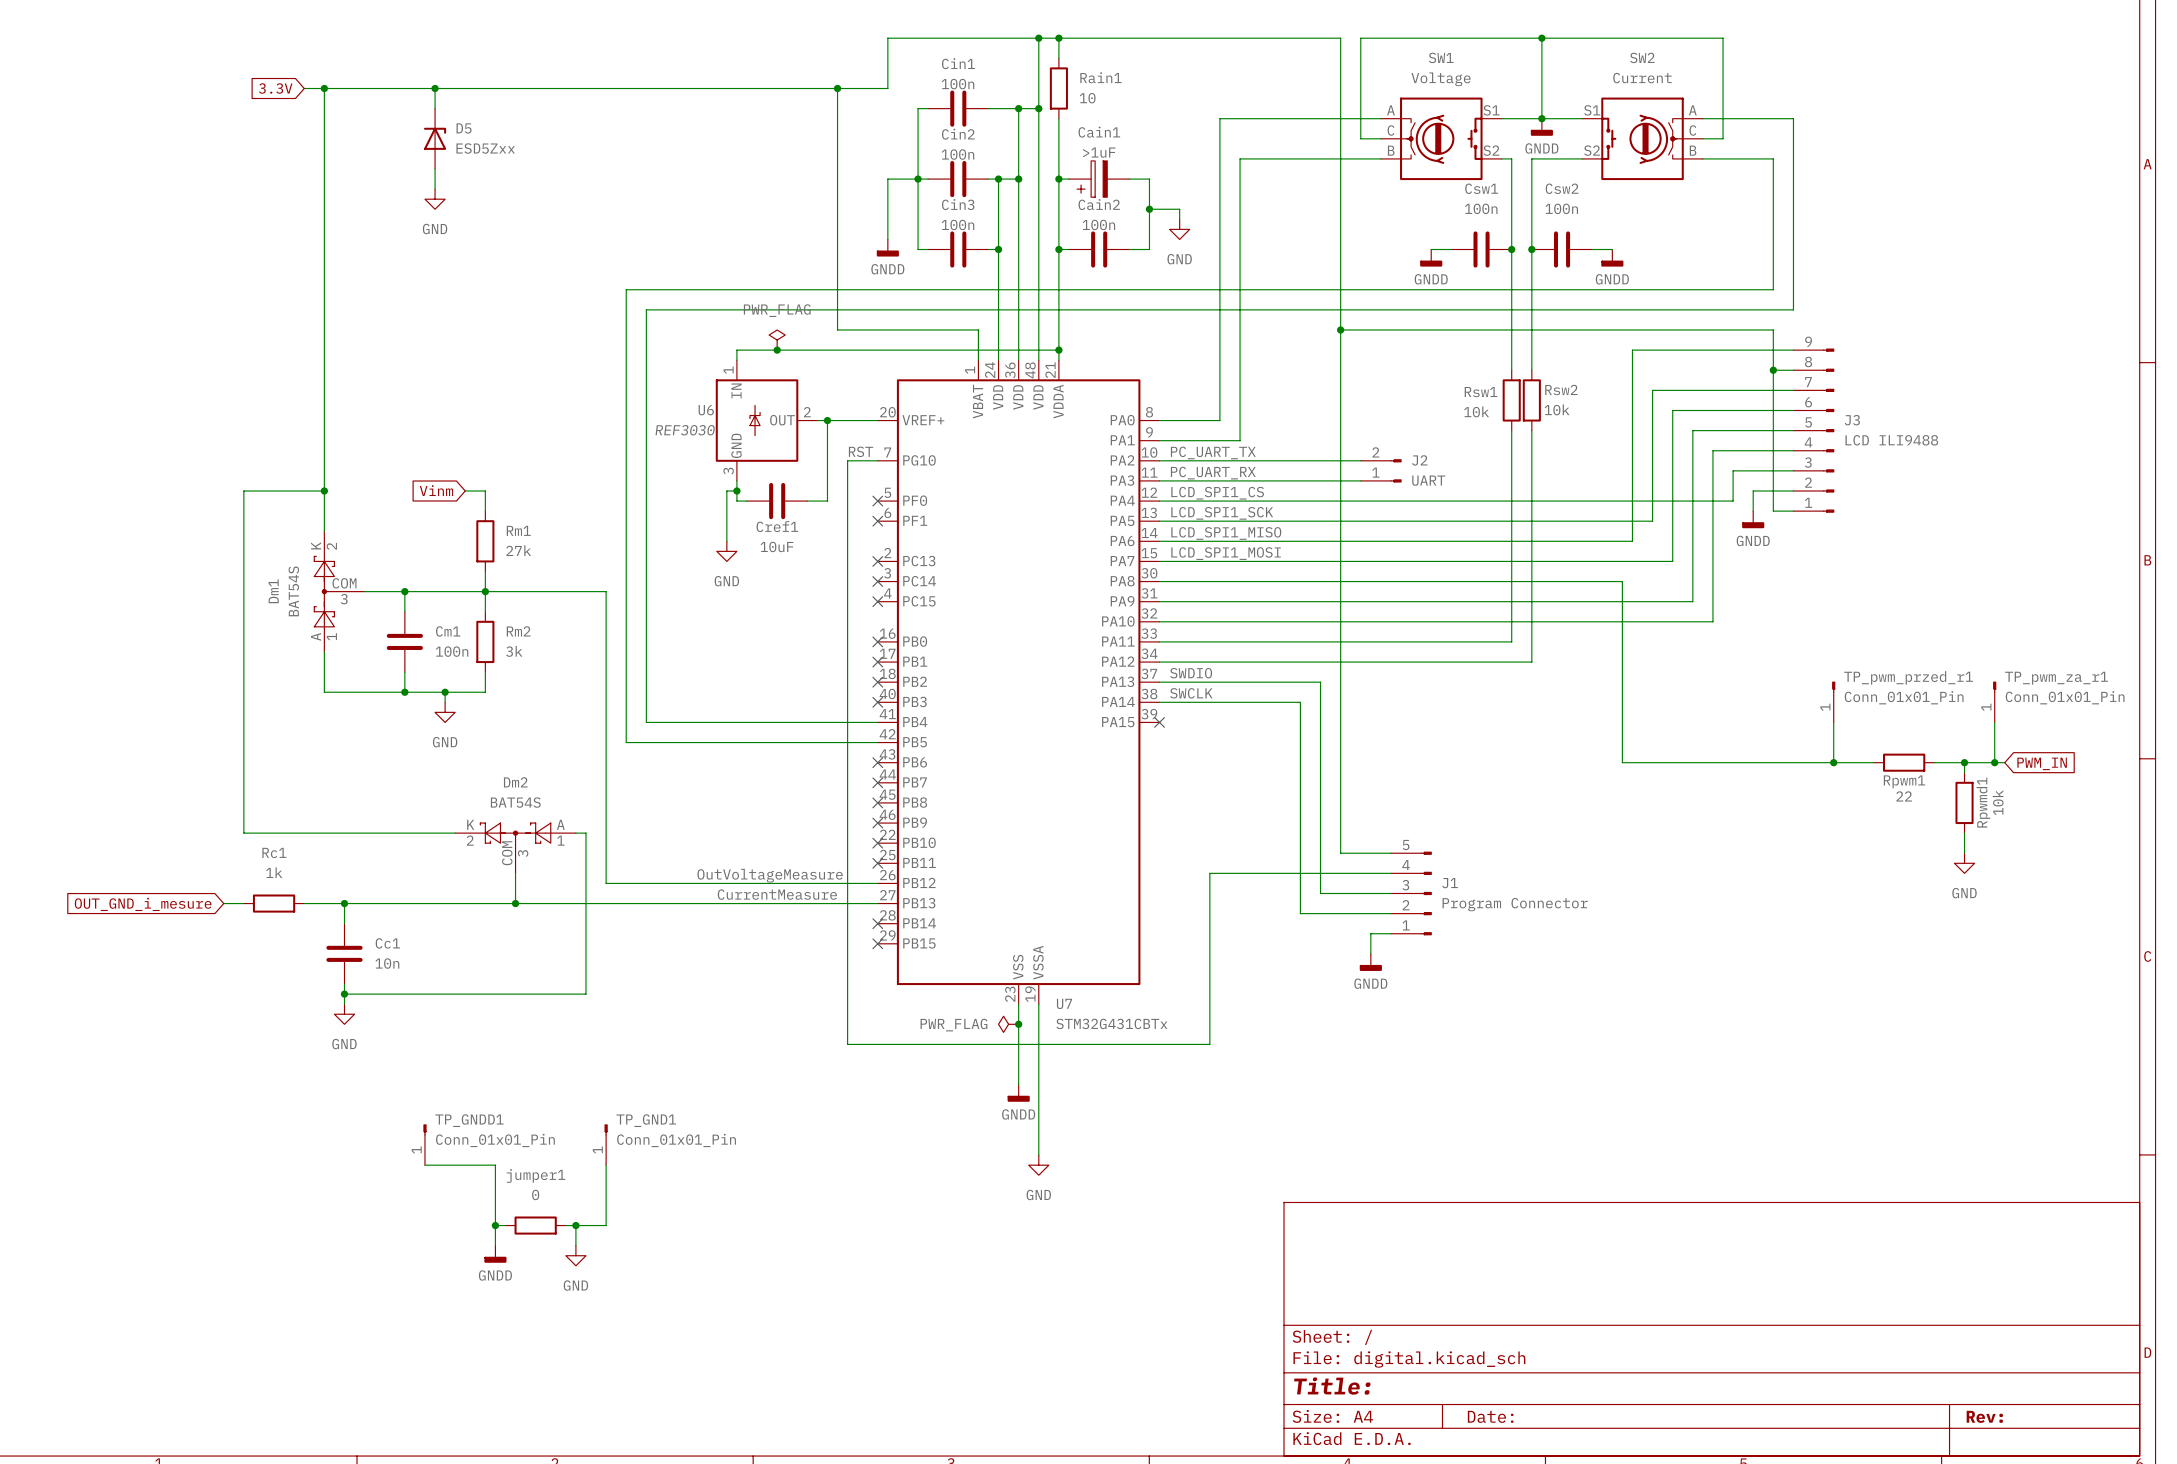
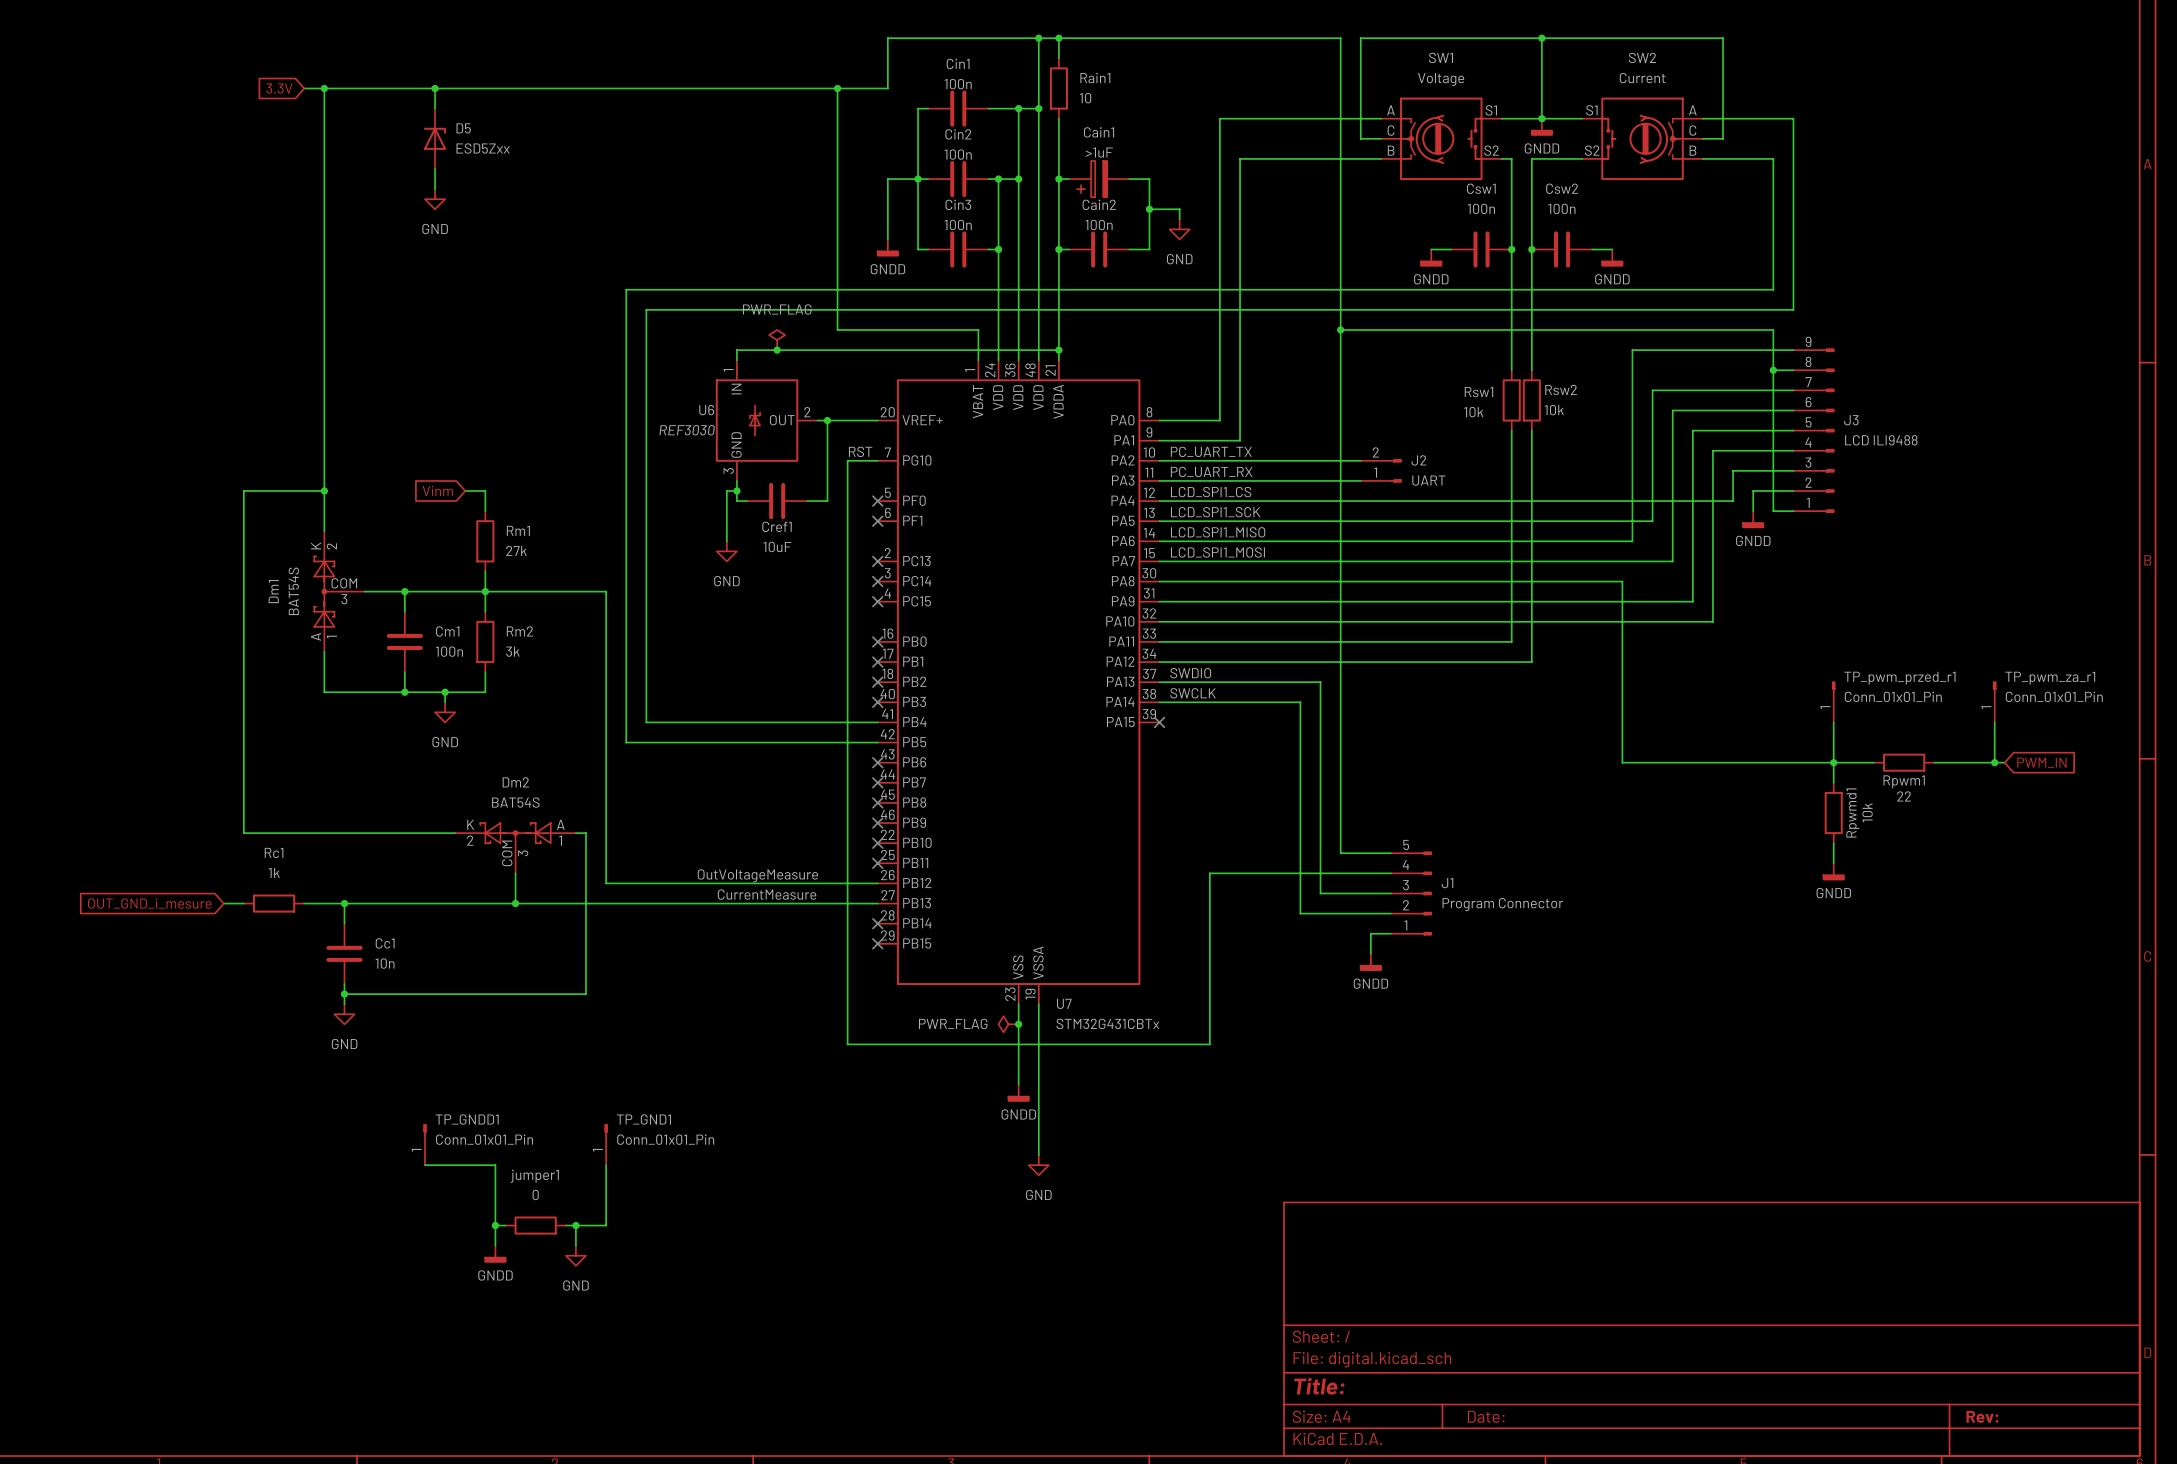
wire: none -> (1833, 762) (1833, 782)
wire: (1964, 762) (1964, 772) -> none
junction: (1964, 762) -> none
Rpwmd1 position: (1964, 802) -> (1833, 812)
wire: (1964, 833) (1964, 853) -> (1833, 843) (1833, 863)
power symbol: GND (1964, 863) -> none
power symbol: none -> GNDD (1833, 871)

